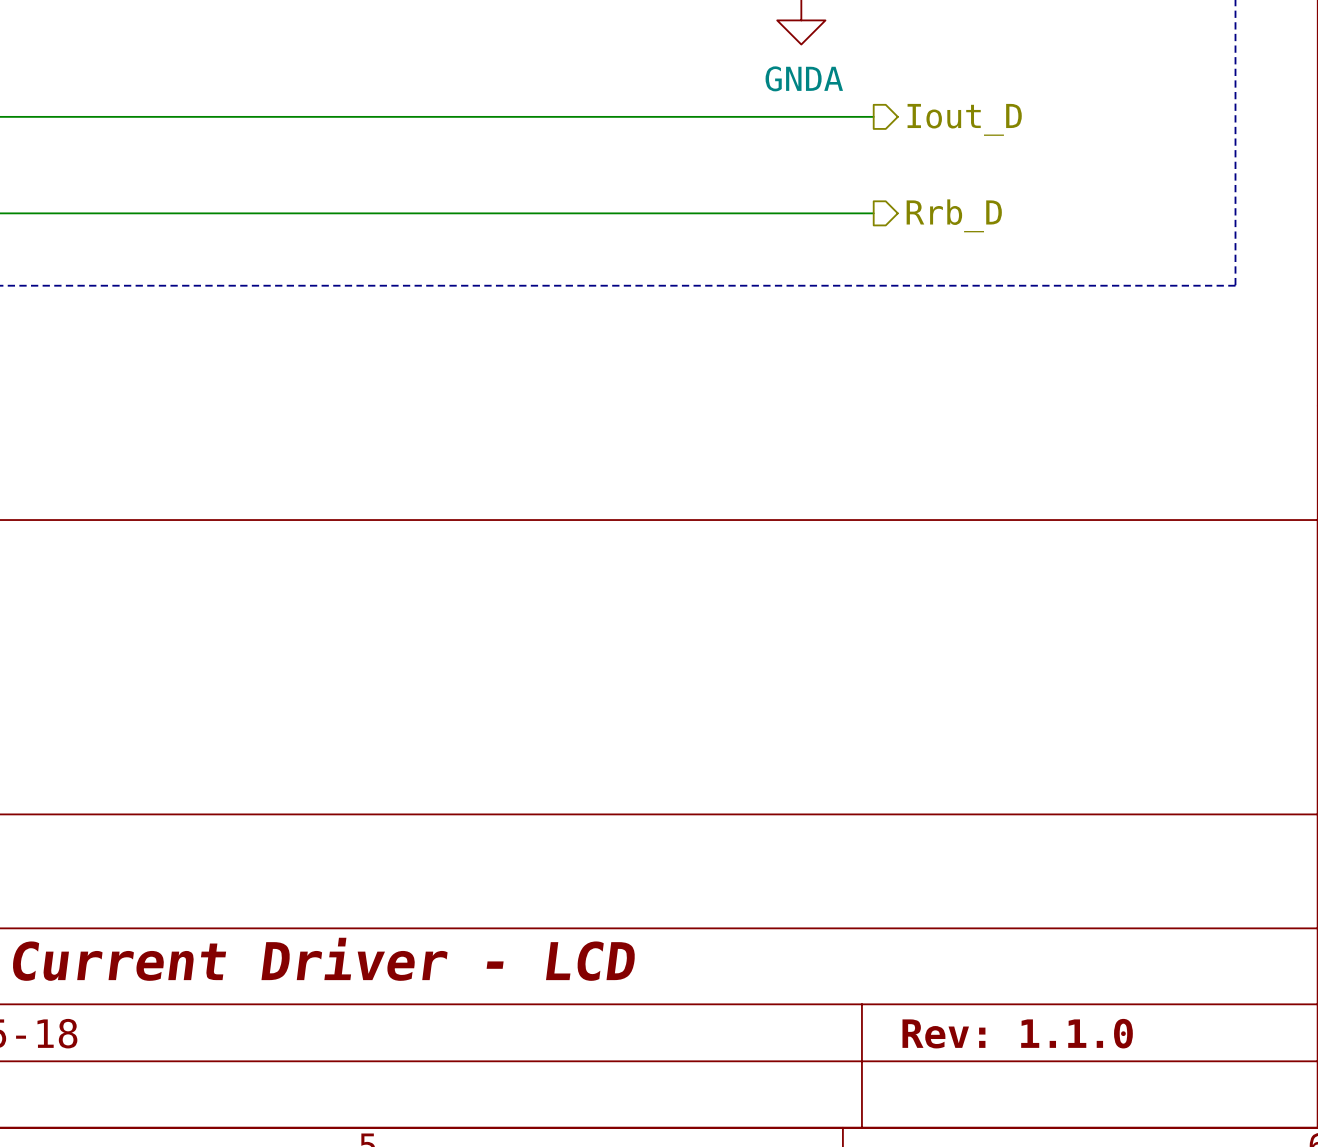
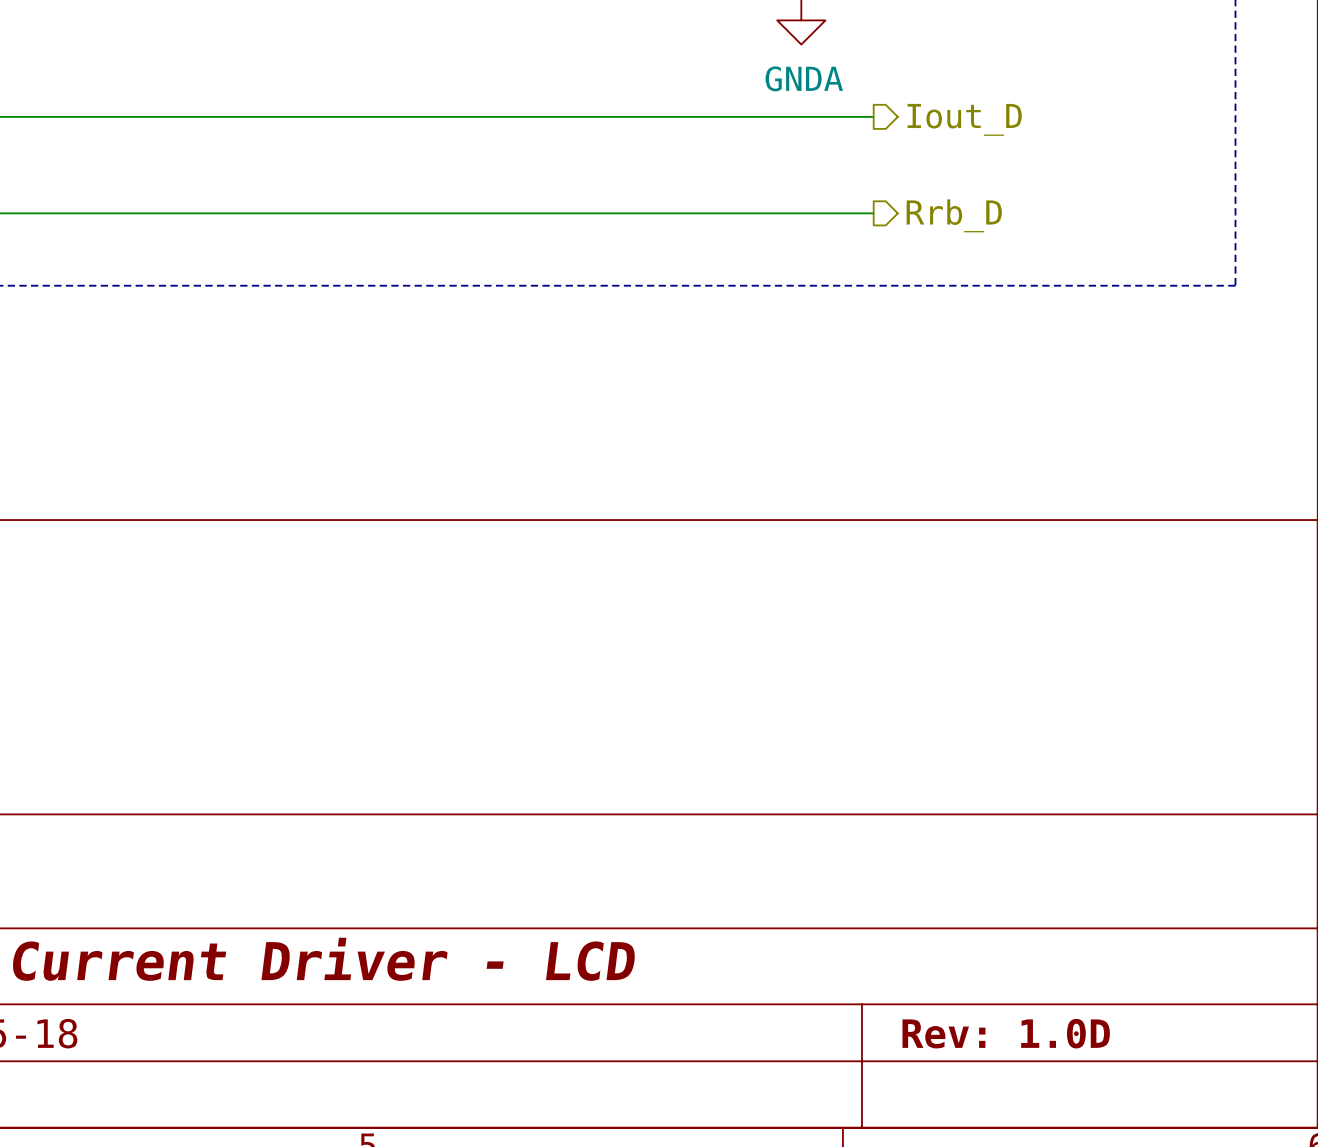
title block: Rev: 1.1.0 (1017, 1033) -> Rev: 1.0D (1006, 1033)

